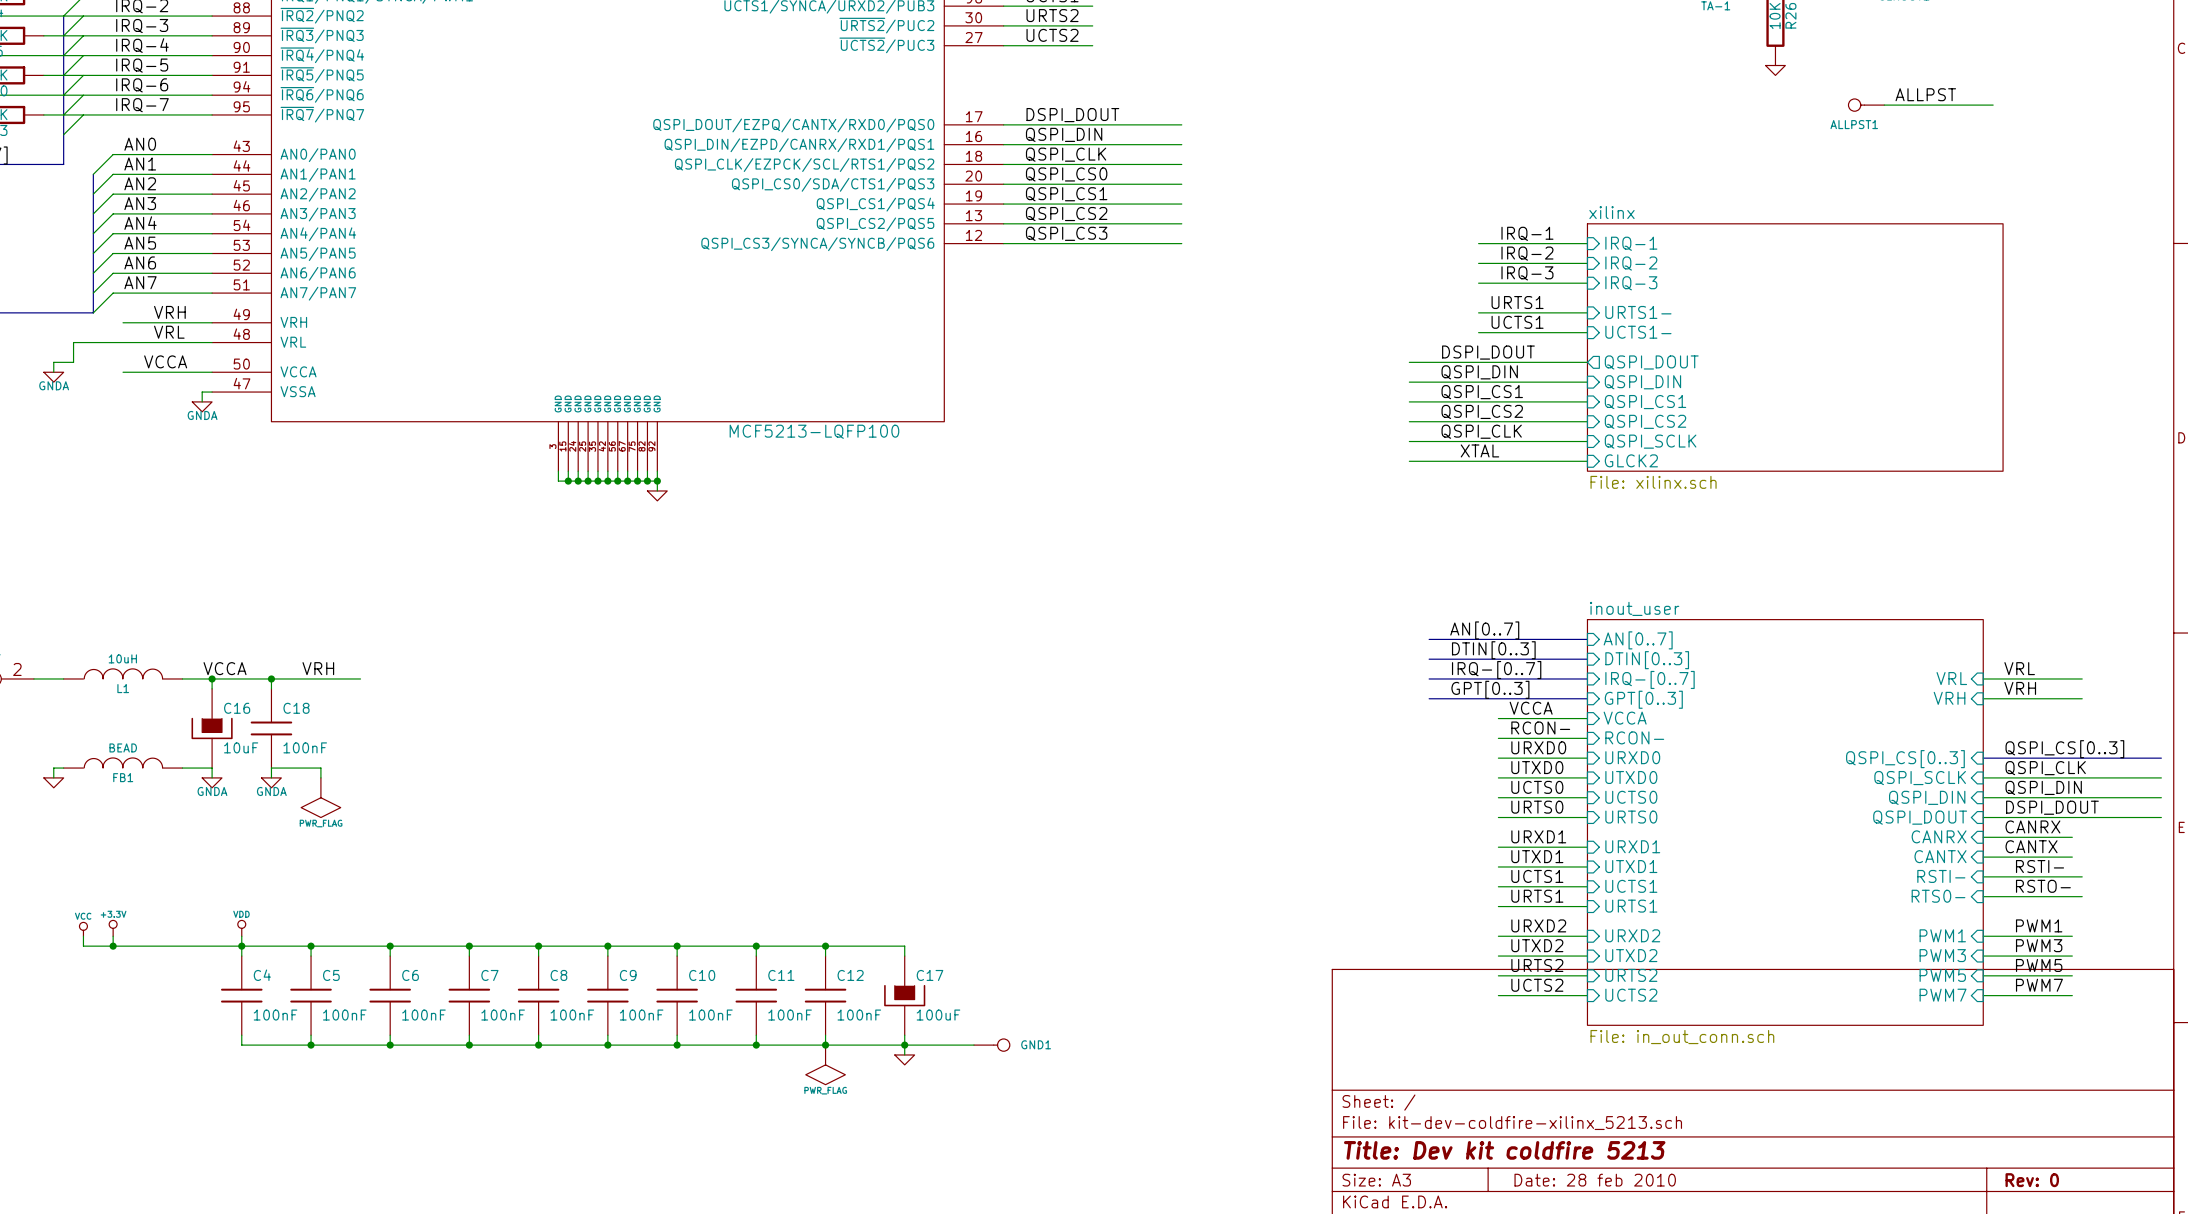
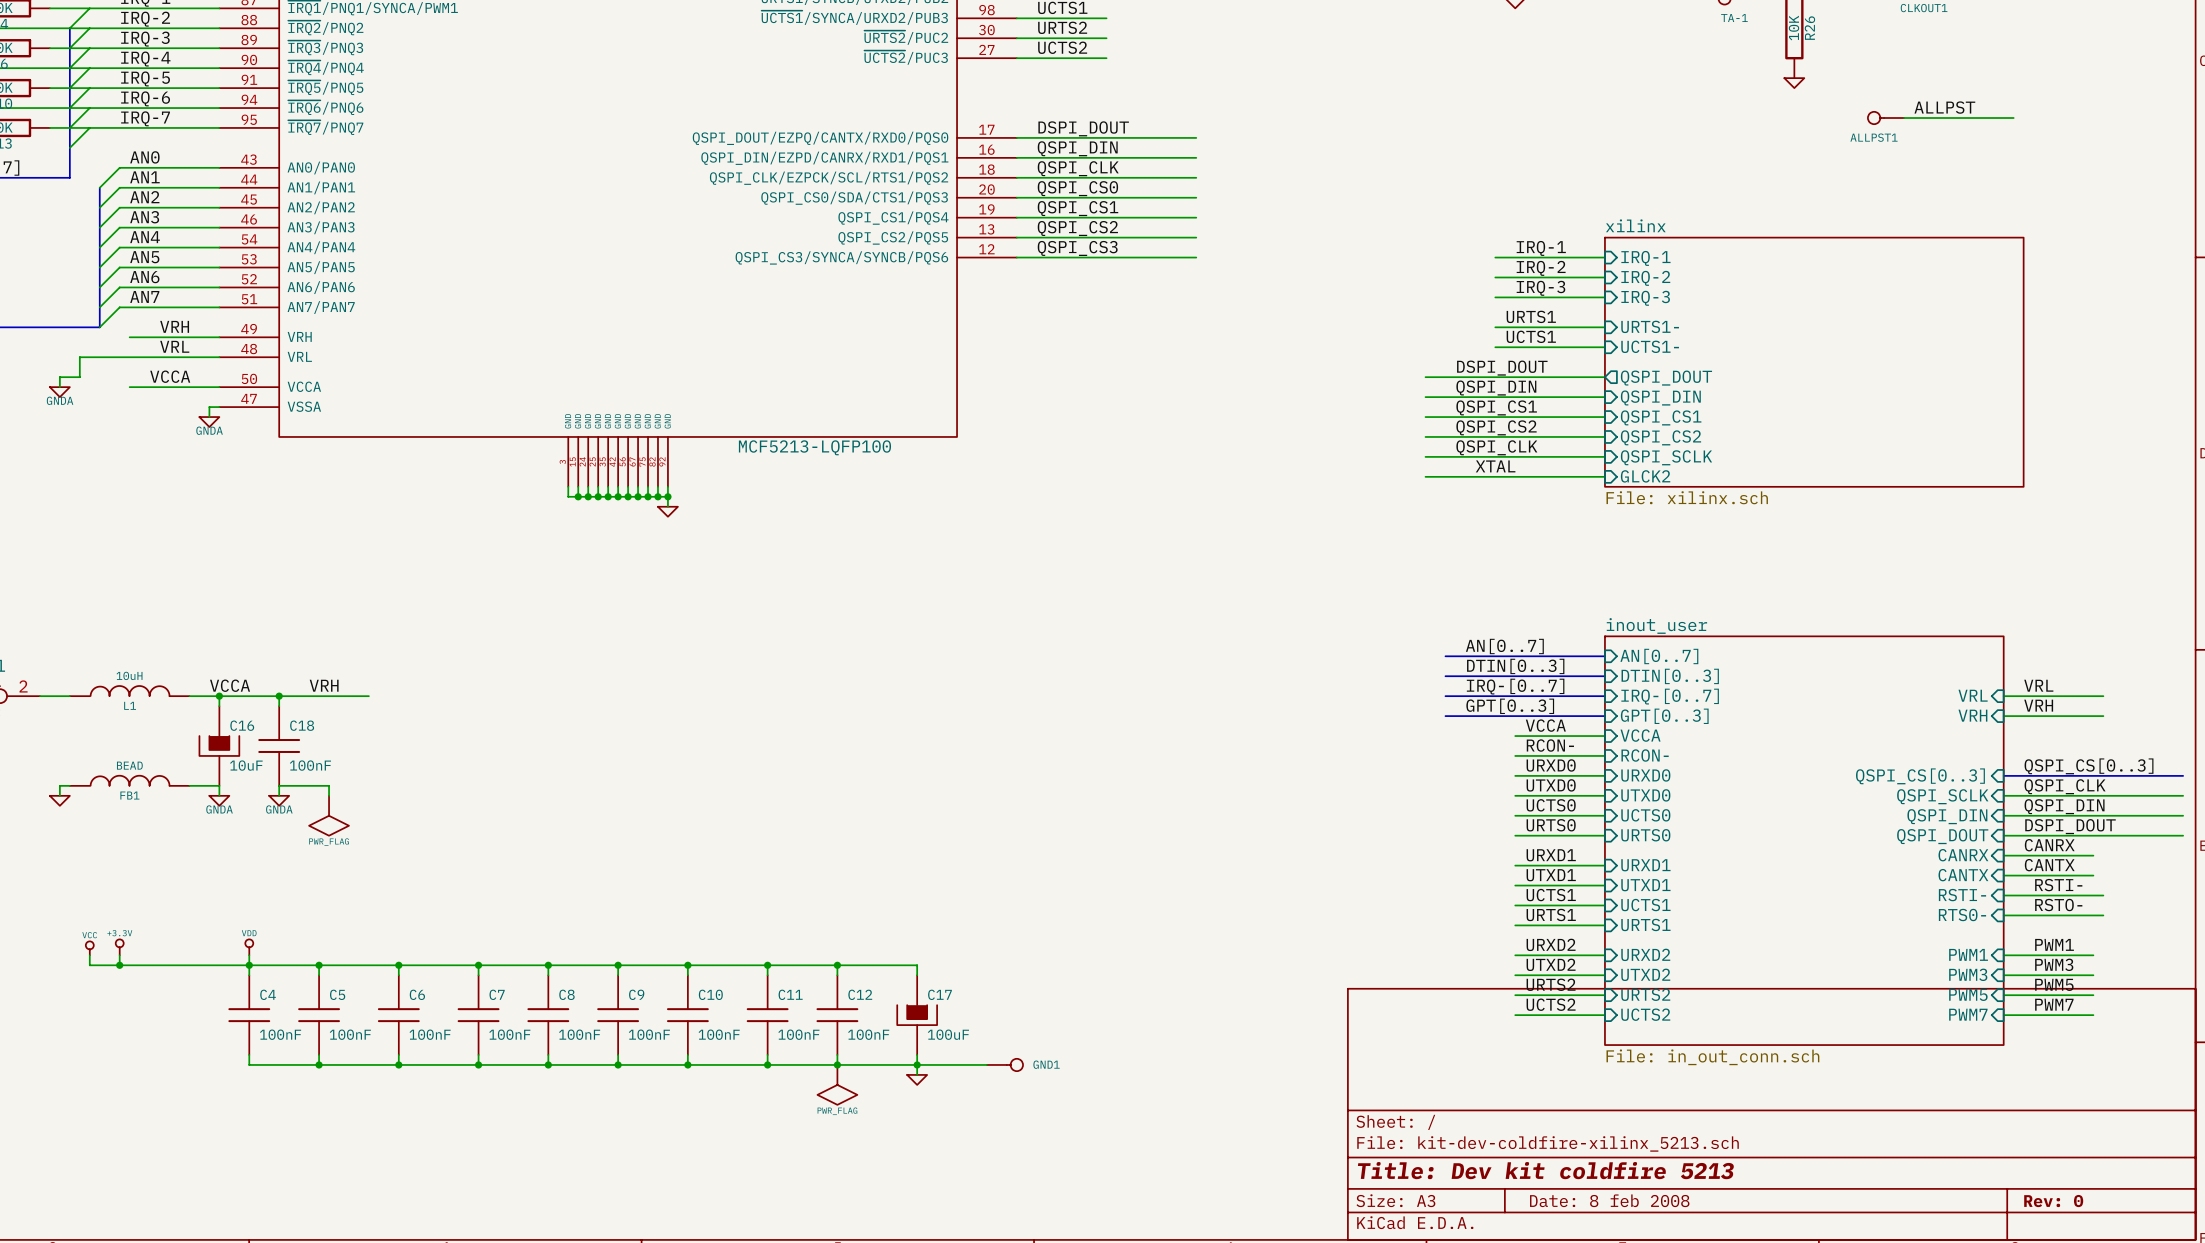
title block: Date: 28 feb 2010 (1595, 1180) -> Date: 8 feb 2008 (1609, 1200)

